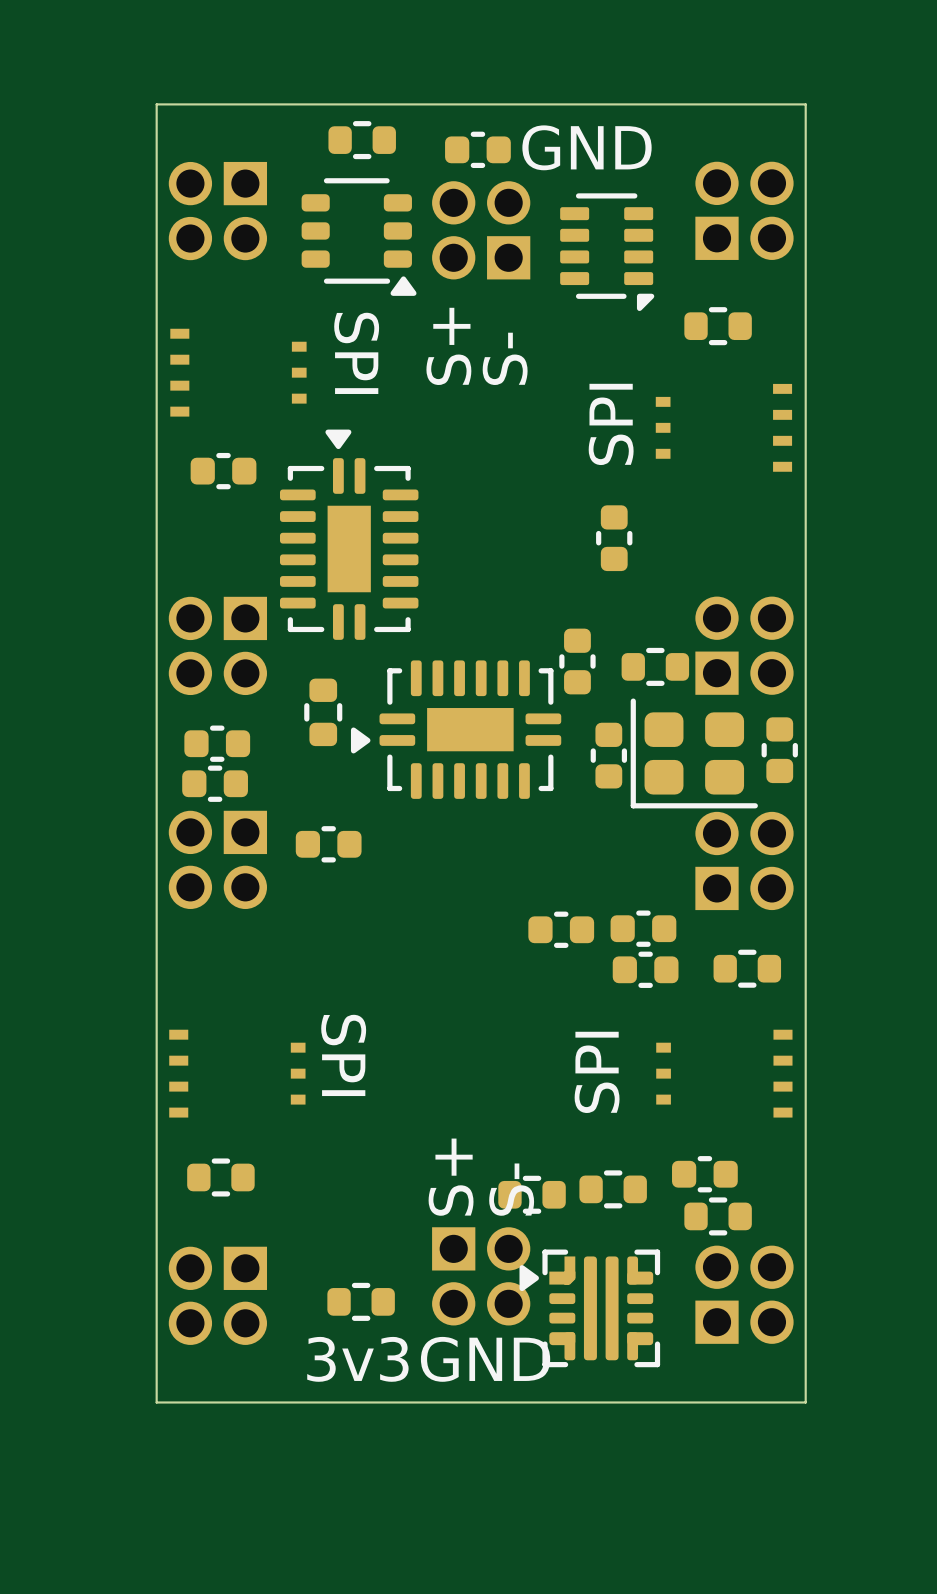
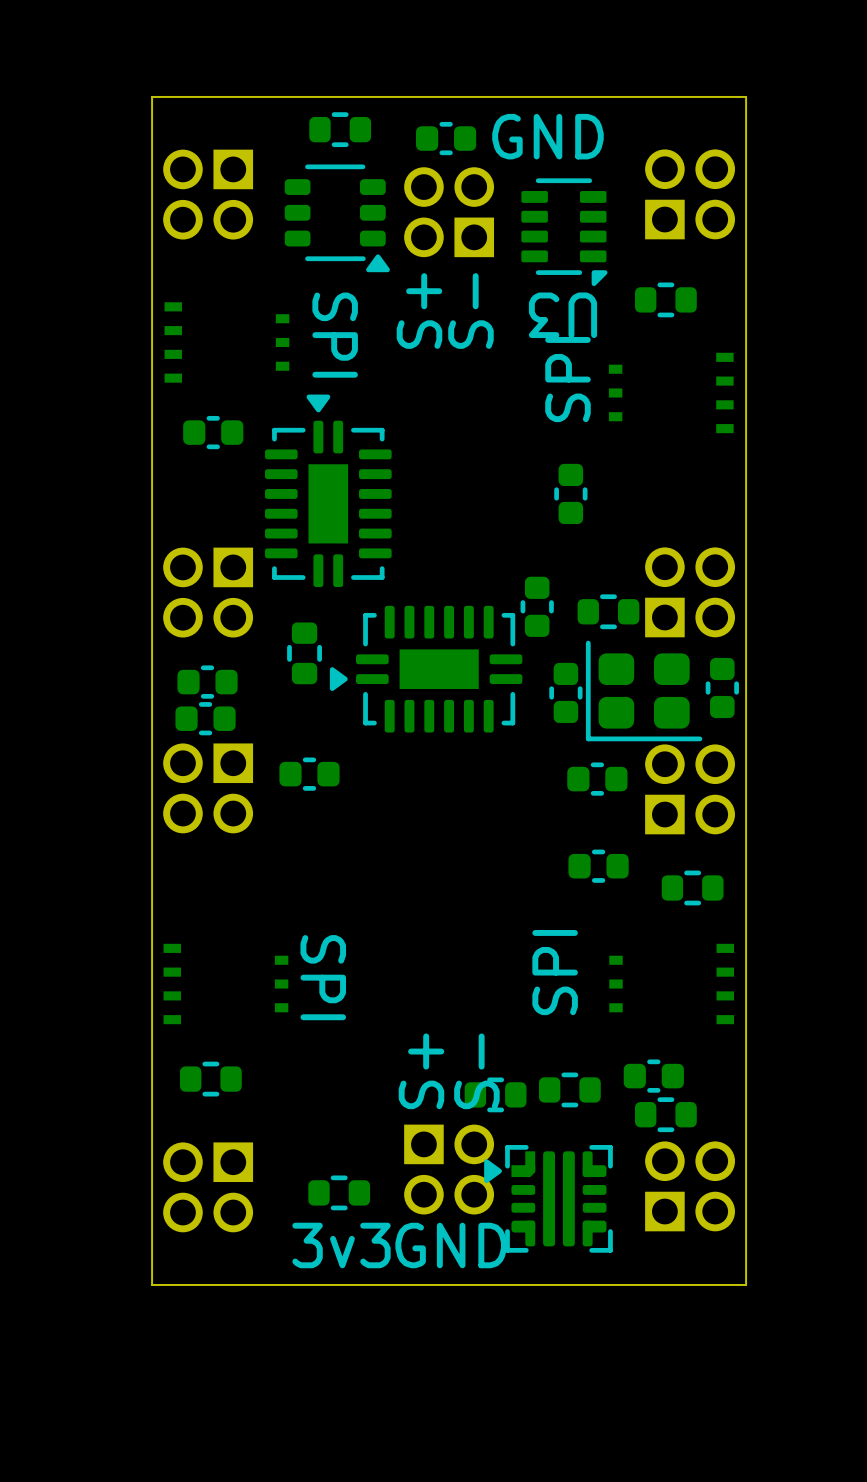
U3 name: none -> U3 (562, 315)
part: none -> (597, 779)
part: (643, 928) -> none
part: (561, 929) -> none
part: none -> (598, 866)
part: (645, 969) -> none

